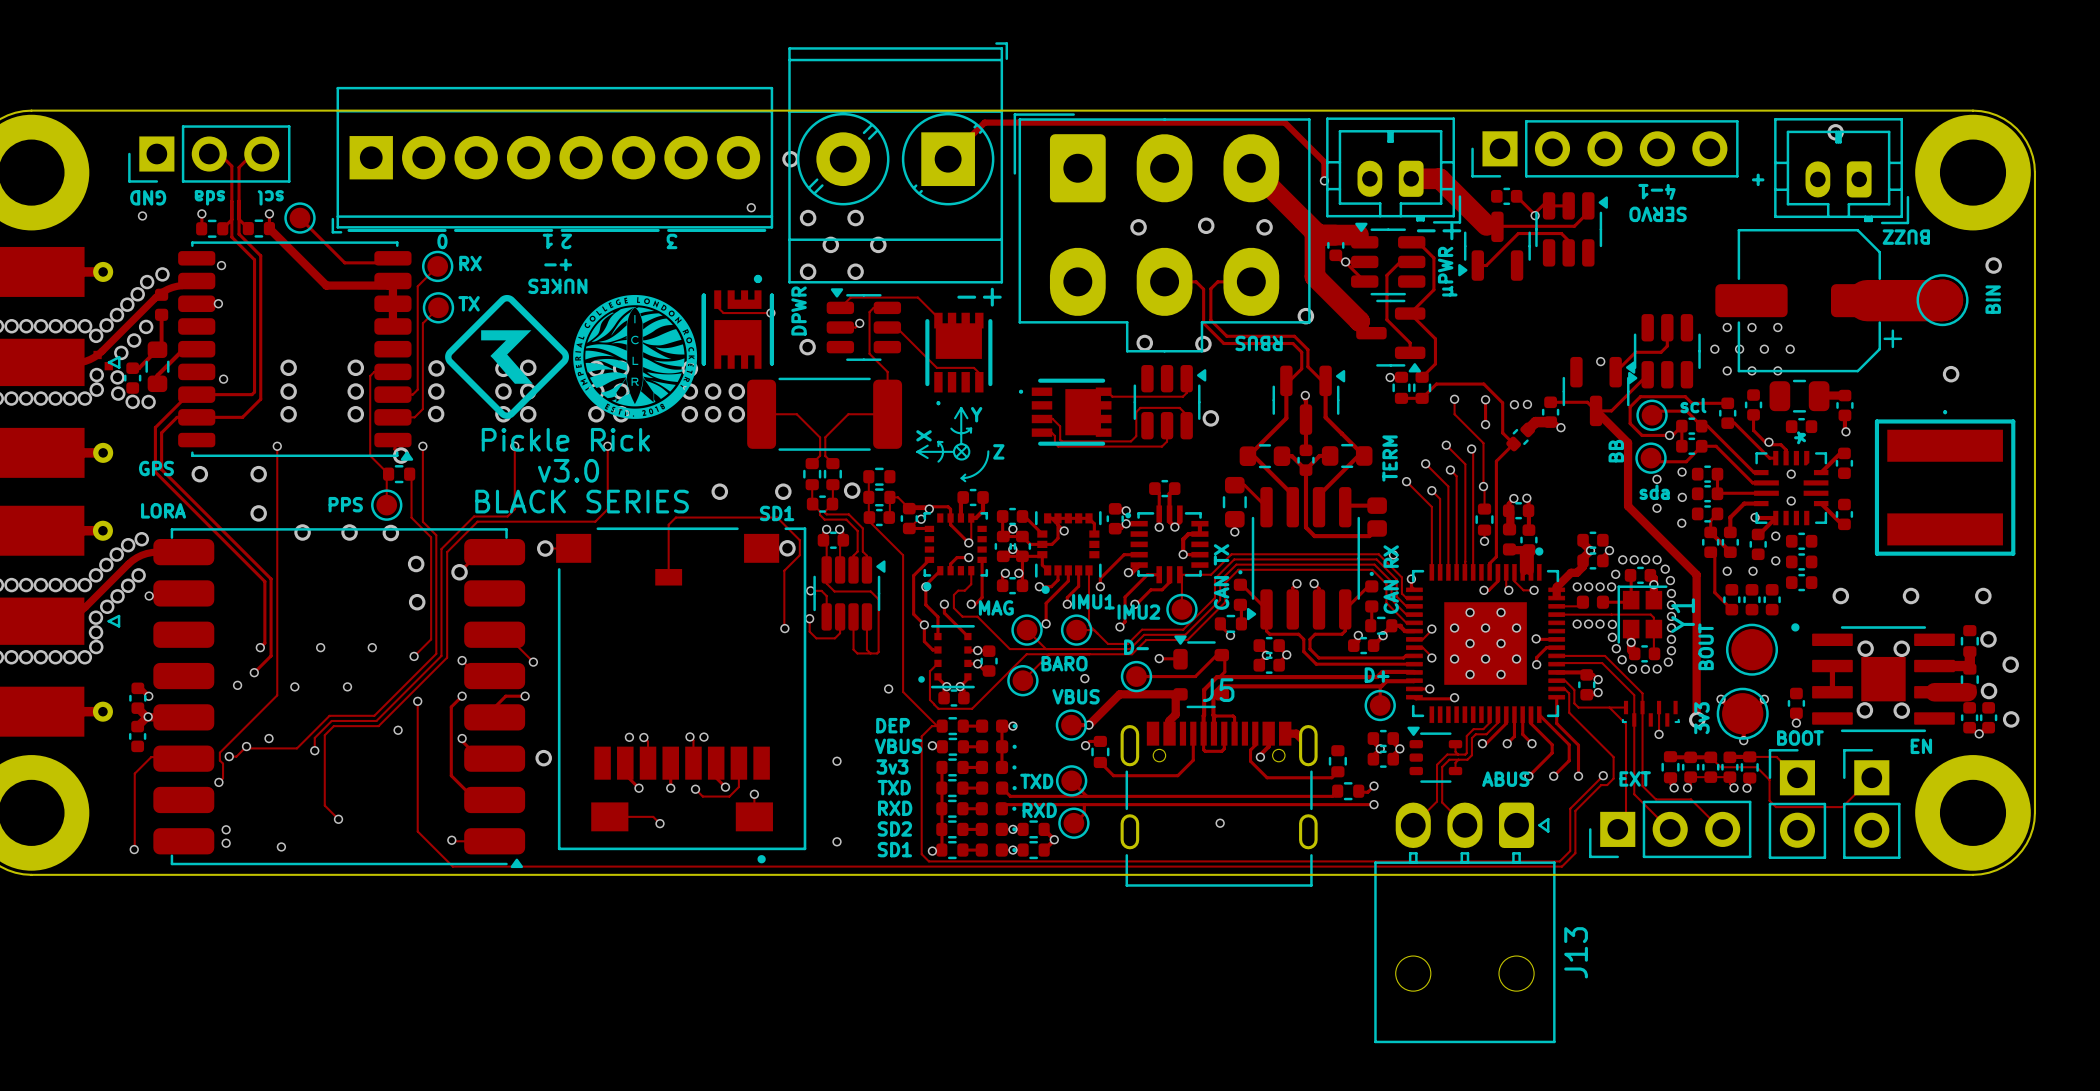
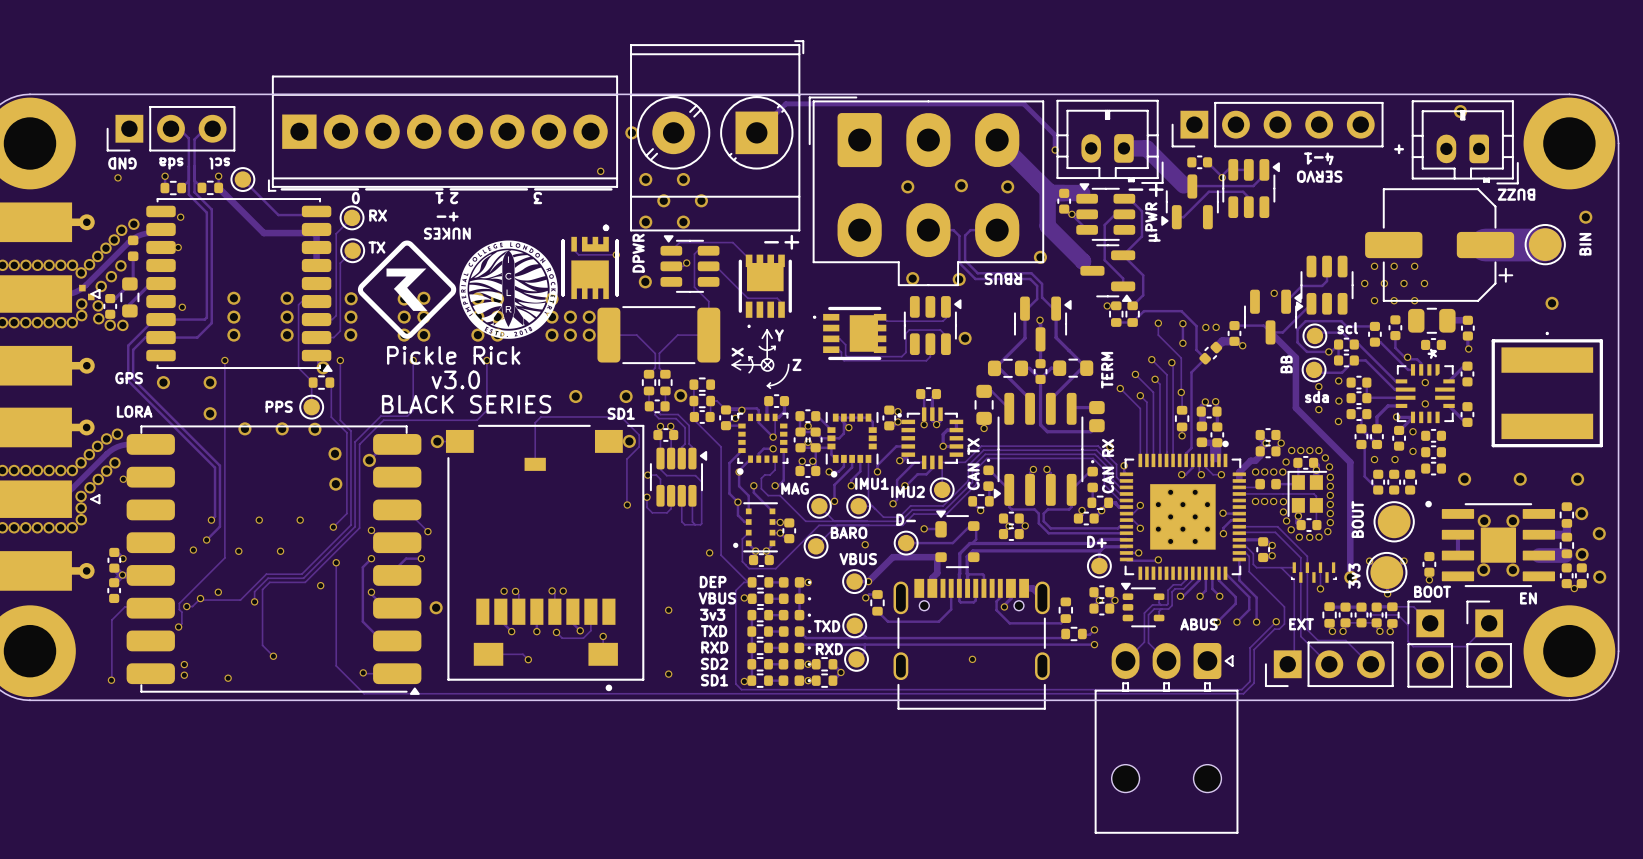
Y1 name: Y1 (1683, 615) -> none
J5 name: J5 (1218, 690) -> none
J13 name: J13 (1576, 952) -> none

